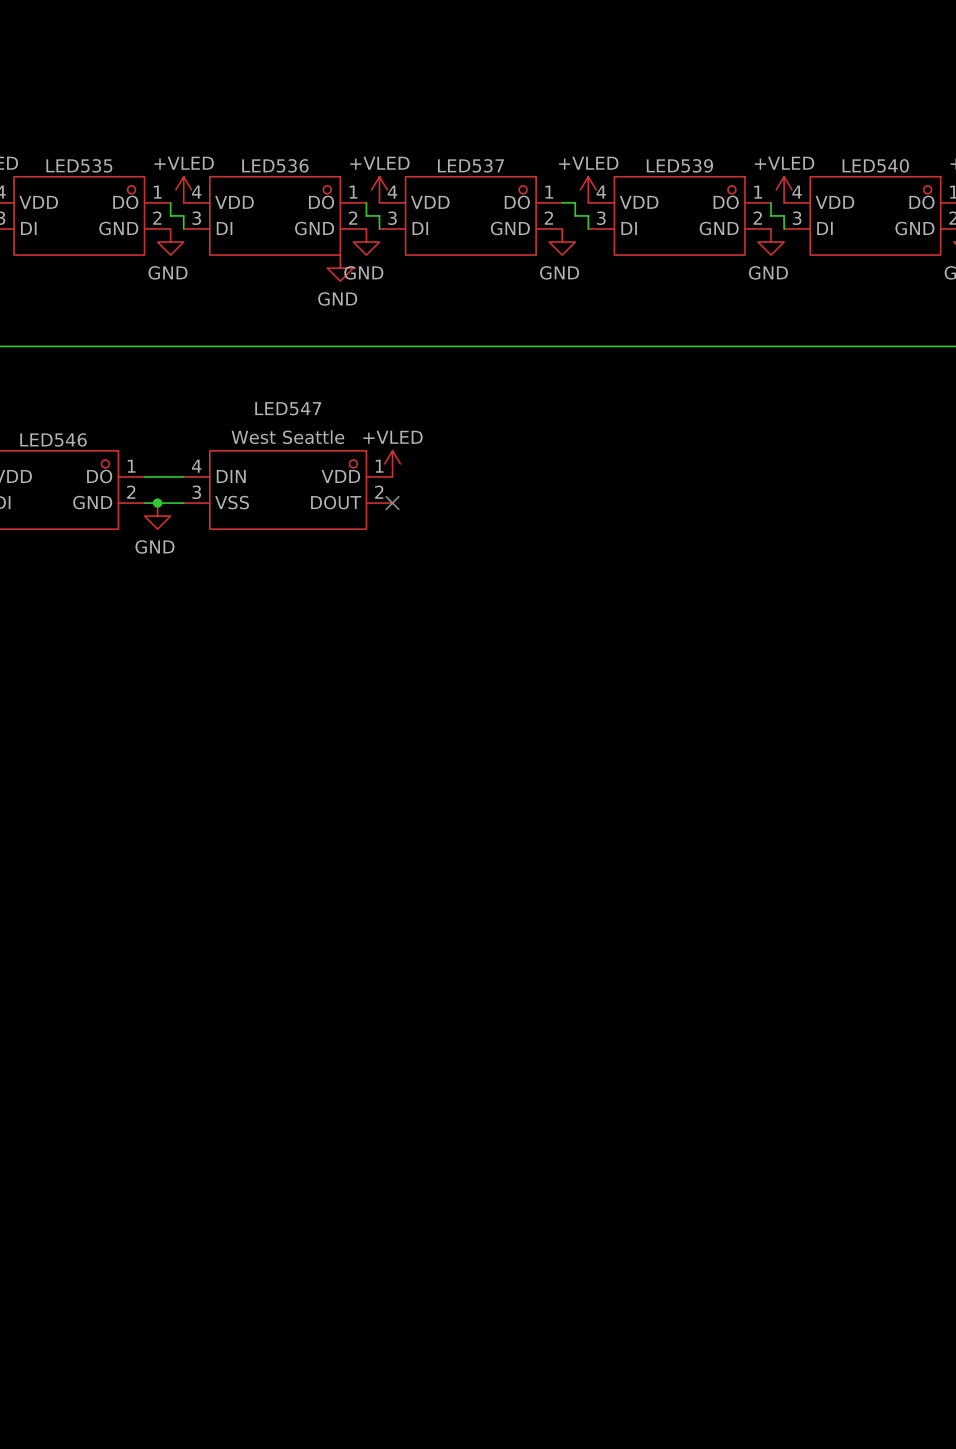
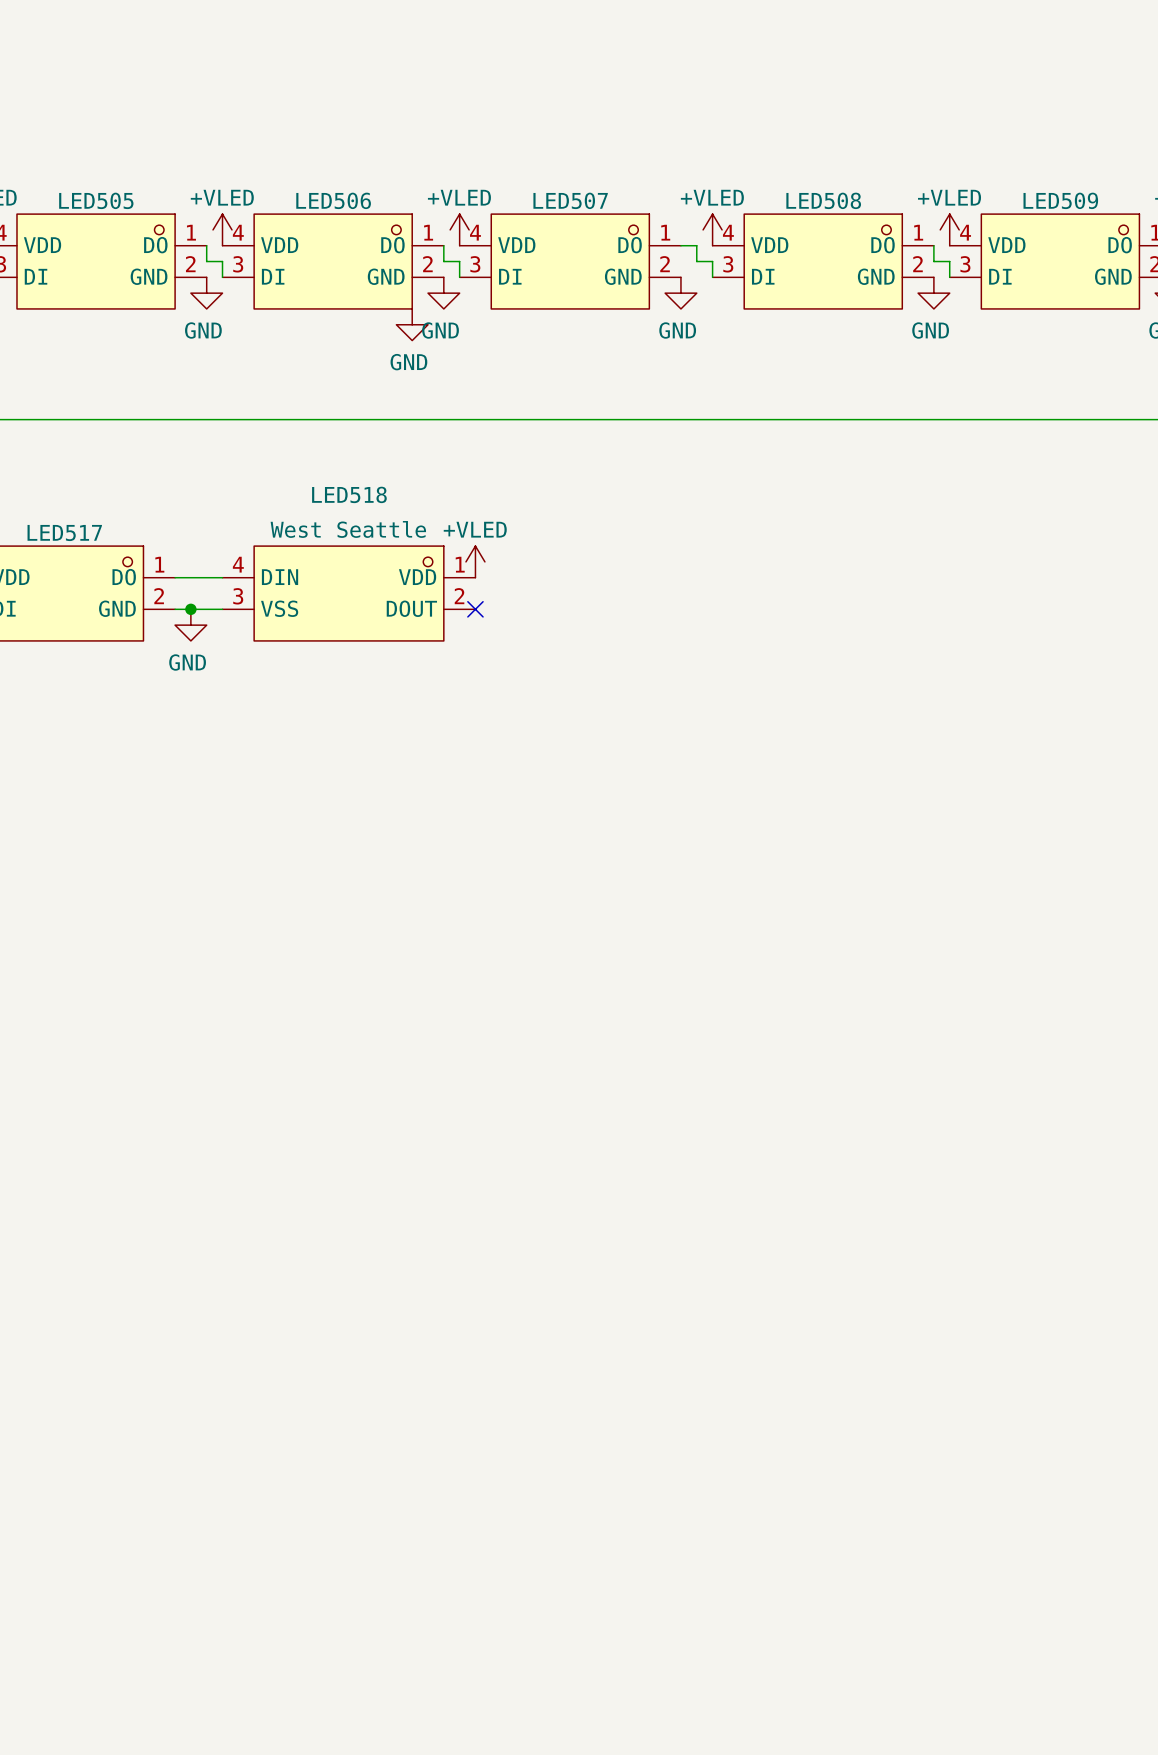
LED535 name: LED535 (79, 165) -> LED505 (96, 200)
LED536 name: LED536 (275, 165) -> LED506 (333, 200)
LED537 name: LED537 (470, 165) -> LED507 (570, 200)
LED539 name: LED539 (679, 165) -> LED508 (823, 200)
LED540 name: LED540 (875, 165) -> LED509 (1060, 200)
LED547 name: LED547 (288, 408) -> LED518 (349, 494)
LED546 name: LED546 (53, 439) -> LED517 (64, 533)

